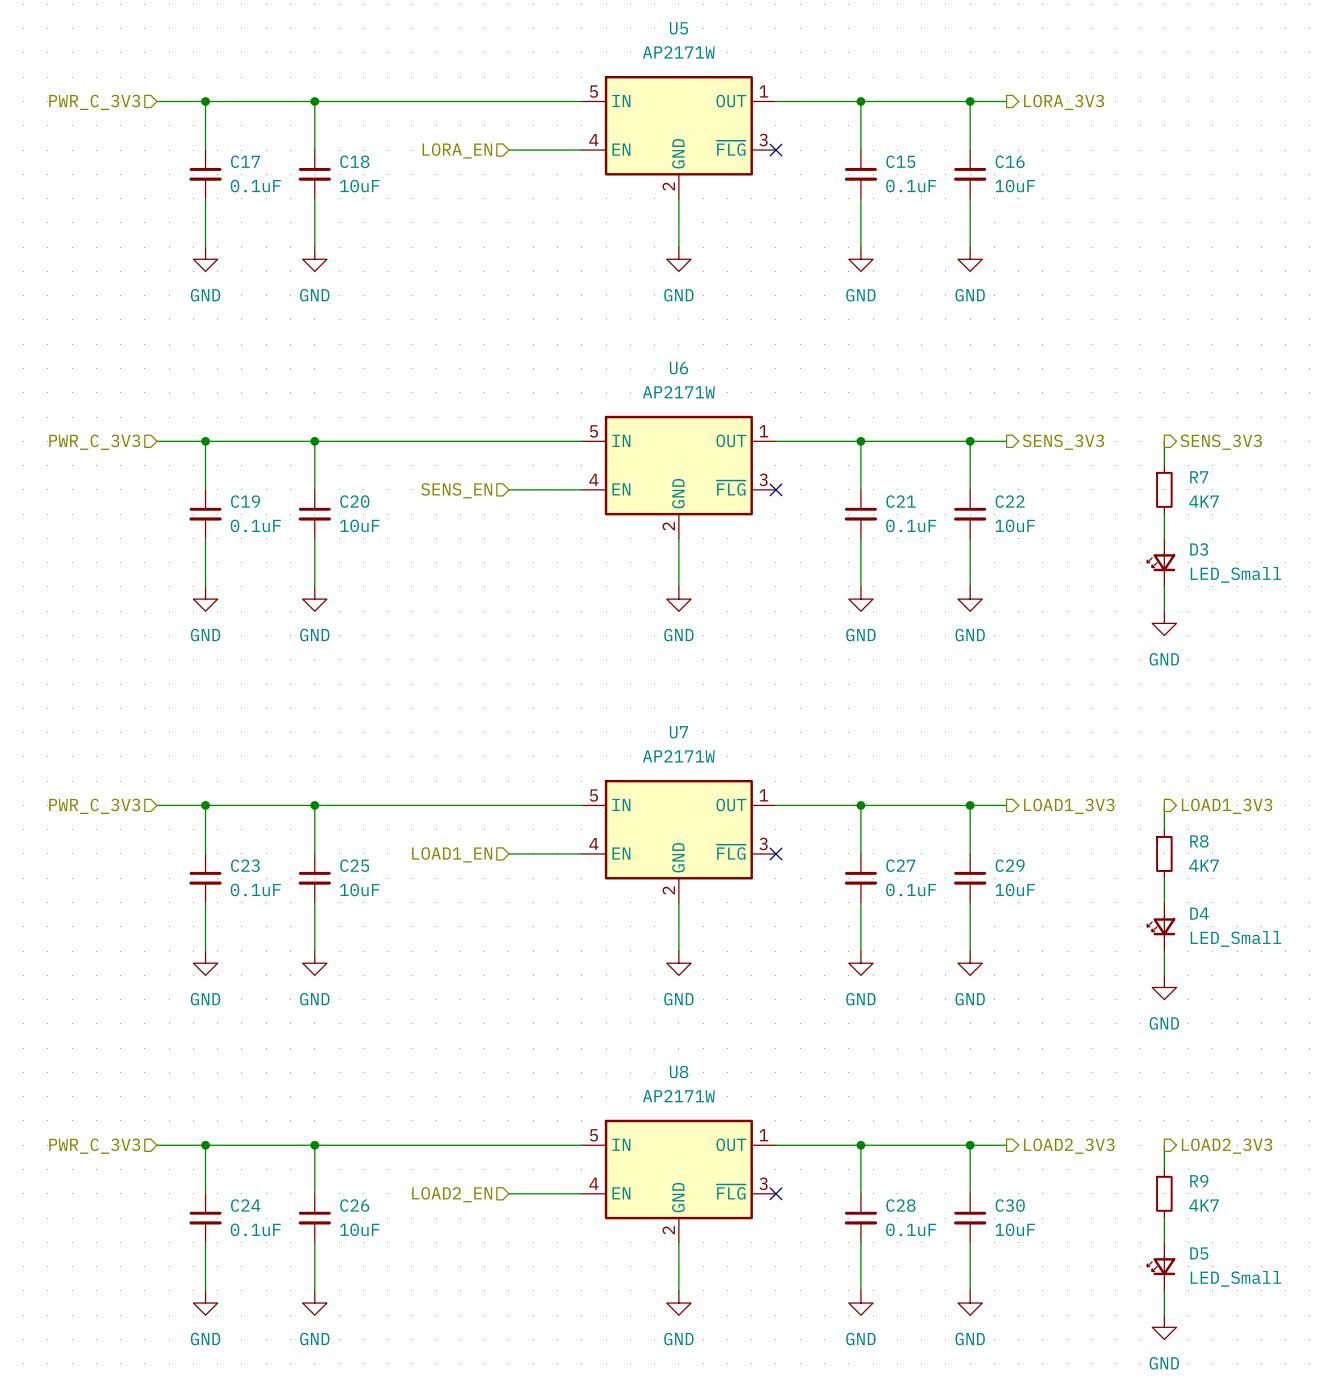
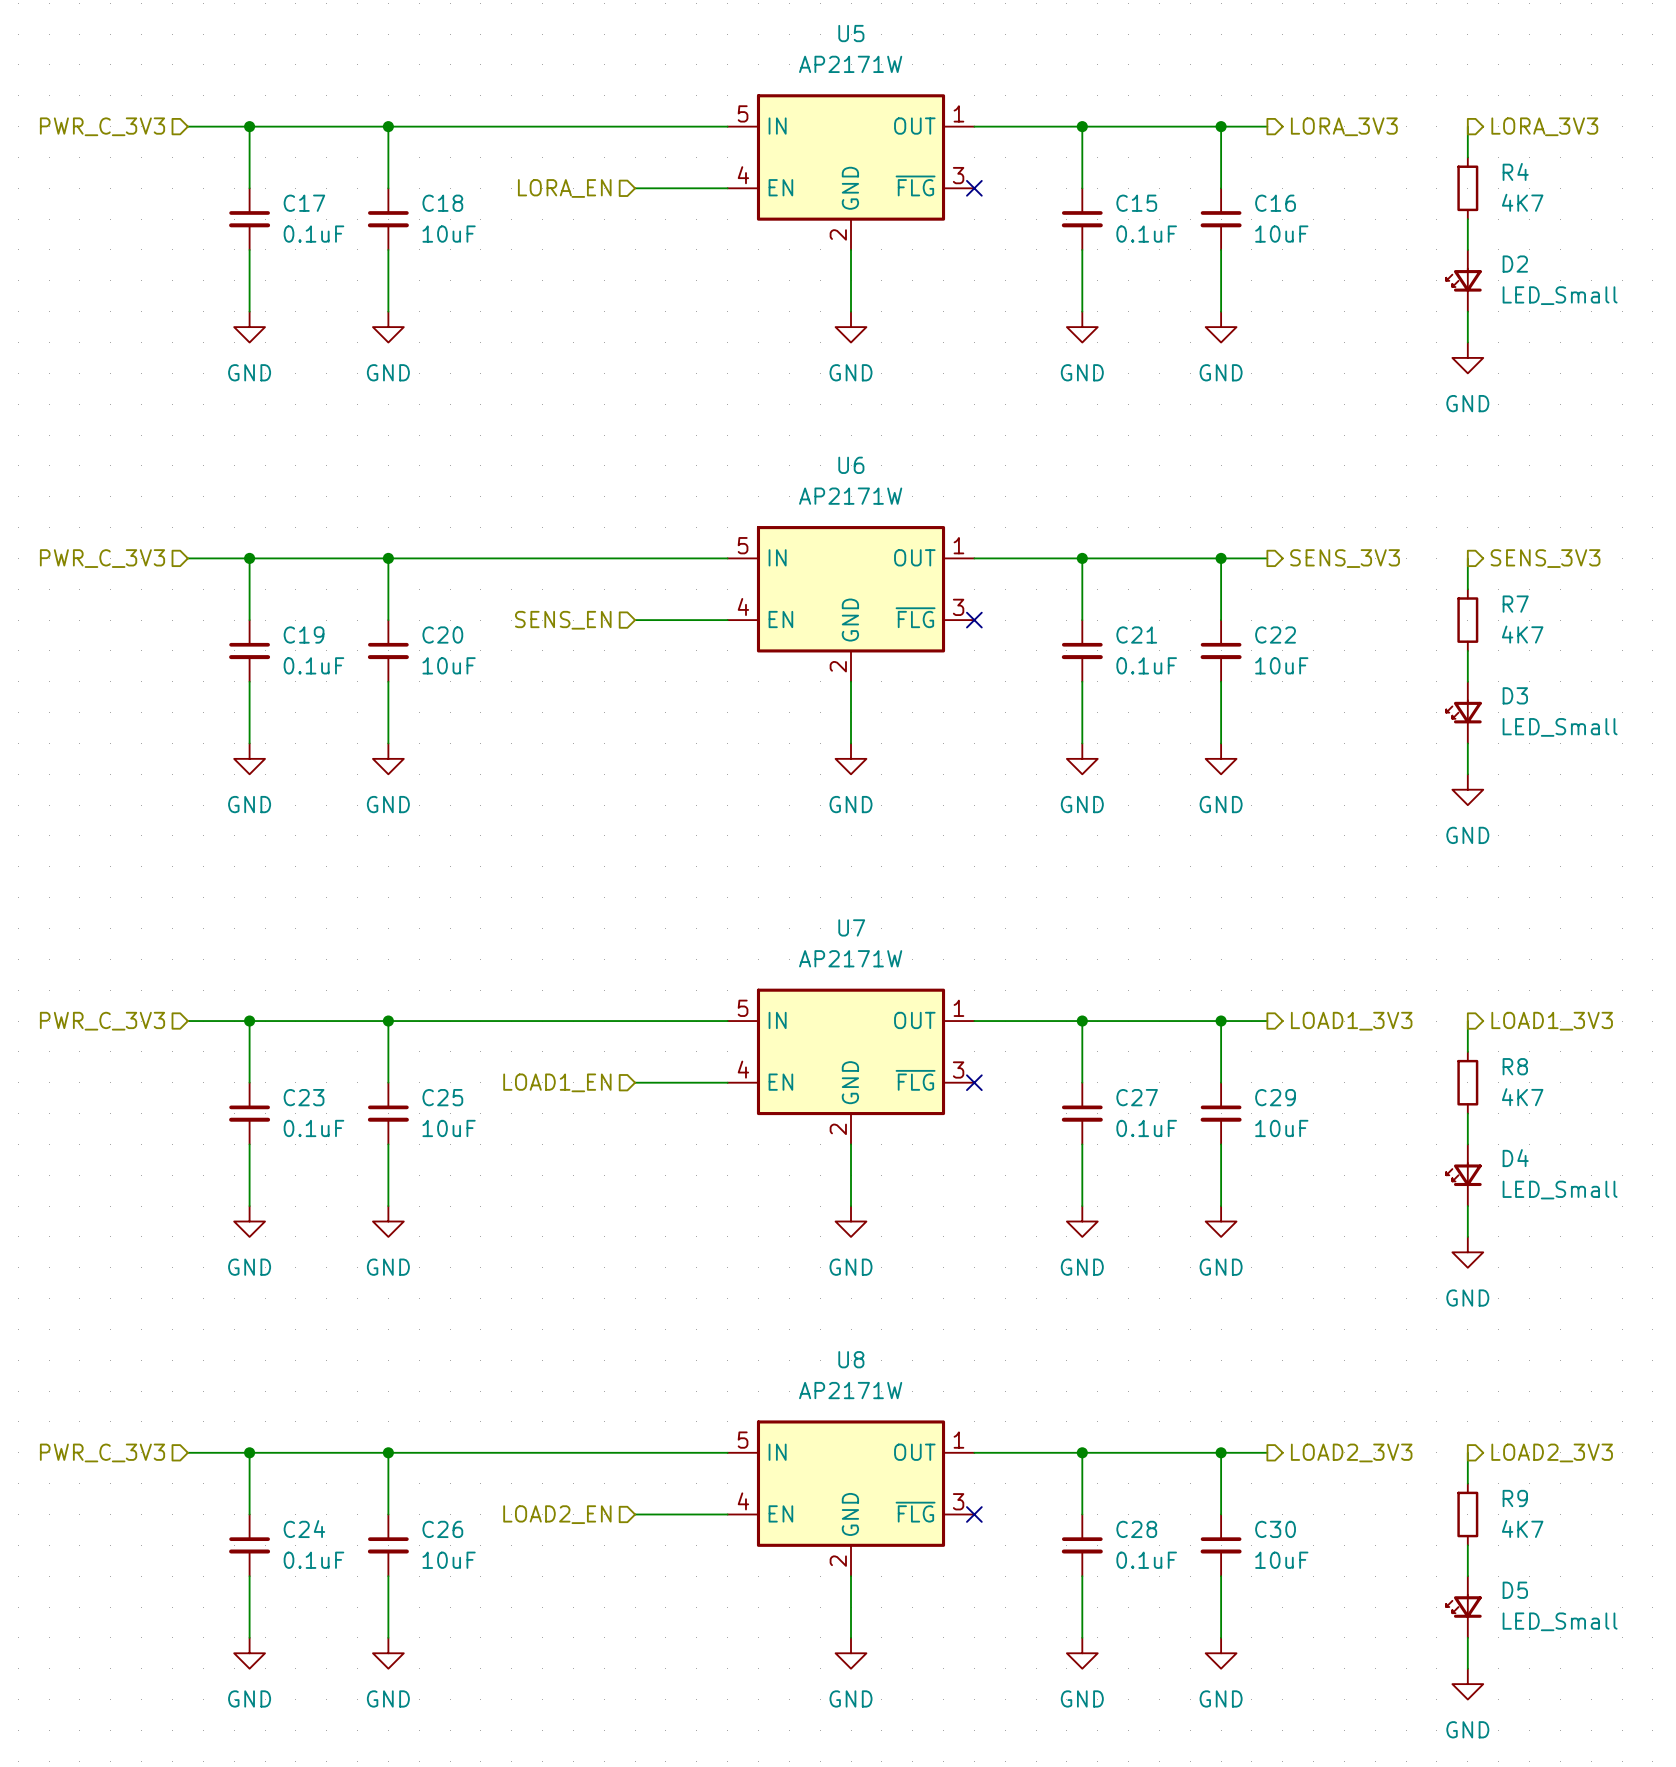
wire: none -> (1467, 126) (1467, 157)
hierarchical label: none -> LORA_3V3 (1544, 126)
R4: none -> 4K7 (1467, 188)
wire: none -> (1467, 219) (1467, 249)
D2: none -> LED_Small (1463, 280)
wire: none -> (1467, 311) (1467, 342)
power symbol: none -> GND (1467, 357)

